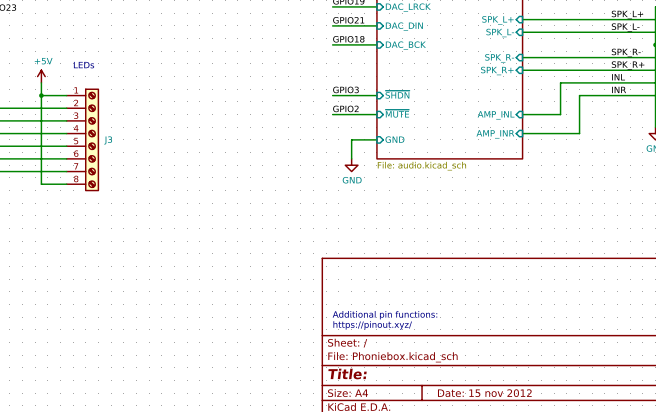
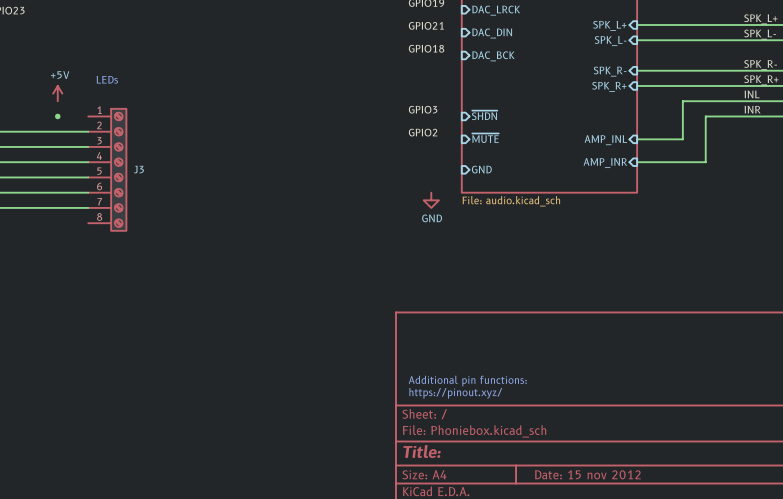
wire: (332, 6) (376, 6) -> none
wire: (332, 25) (376, 25) -> none
wire: (332, 44) (376, 44) -> none
wire: (41, 82) (41, 184) (66, 184) -> none
wire: (41, 95) (66, 95) -> none
wire: (332, 95) (376, 95) -> none
wire: (332, 114) (376, 114) -> none
wire: (376, 139) (351, 139) (351, 158) -> none

